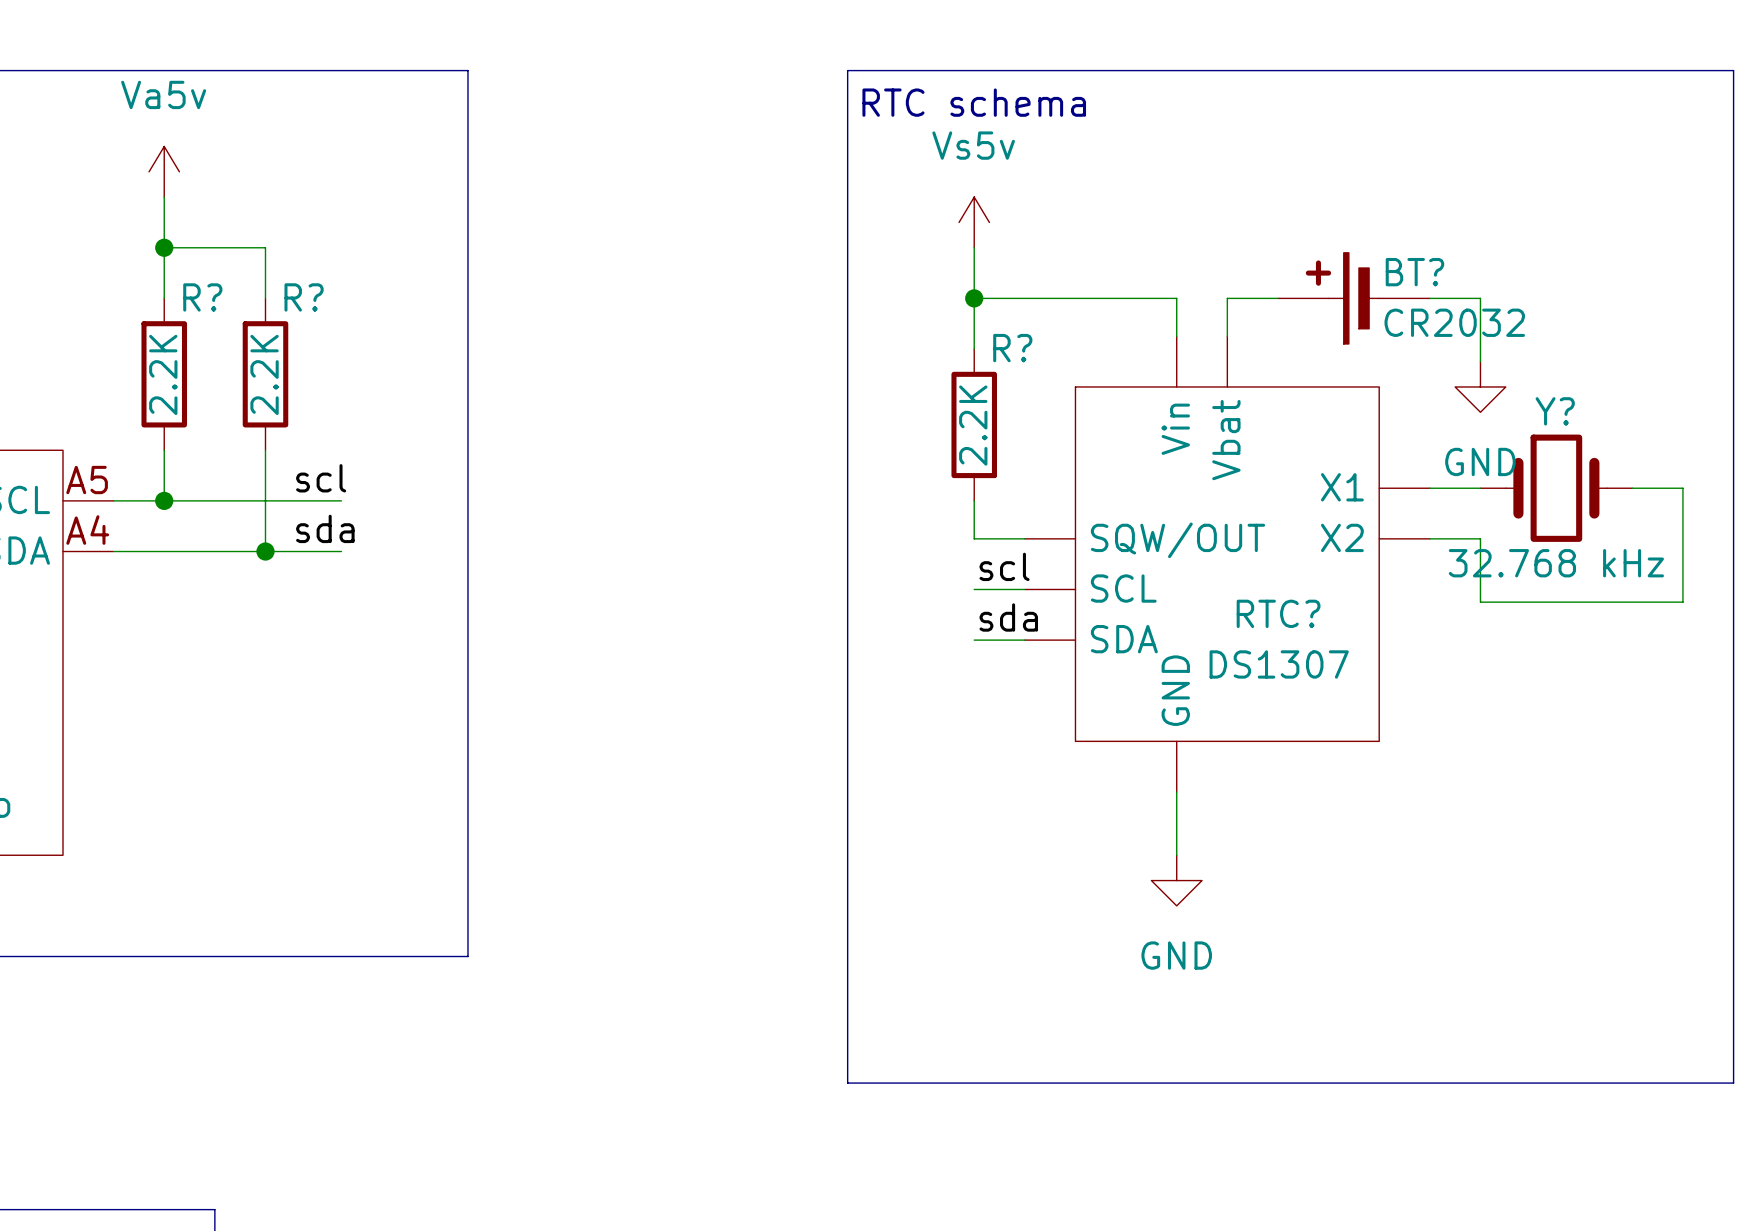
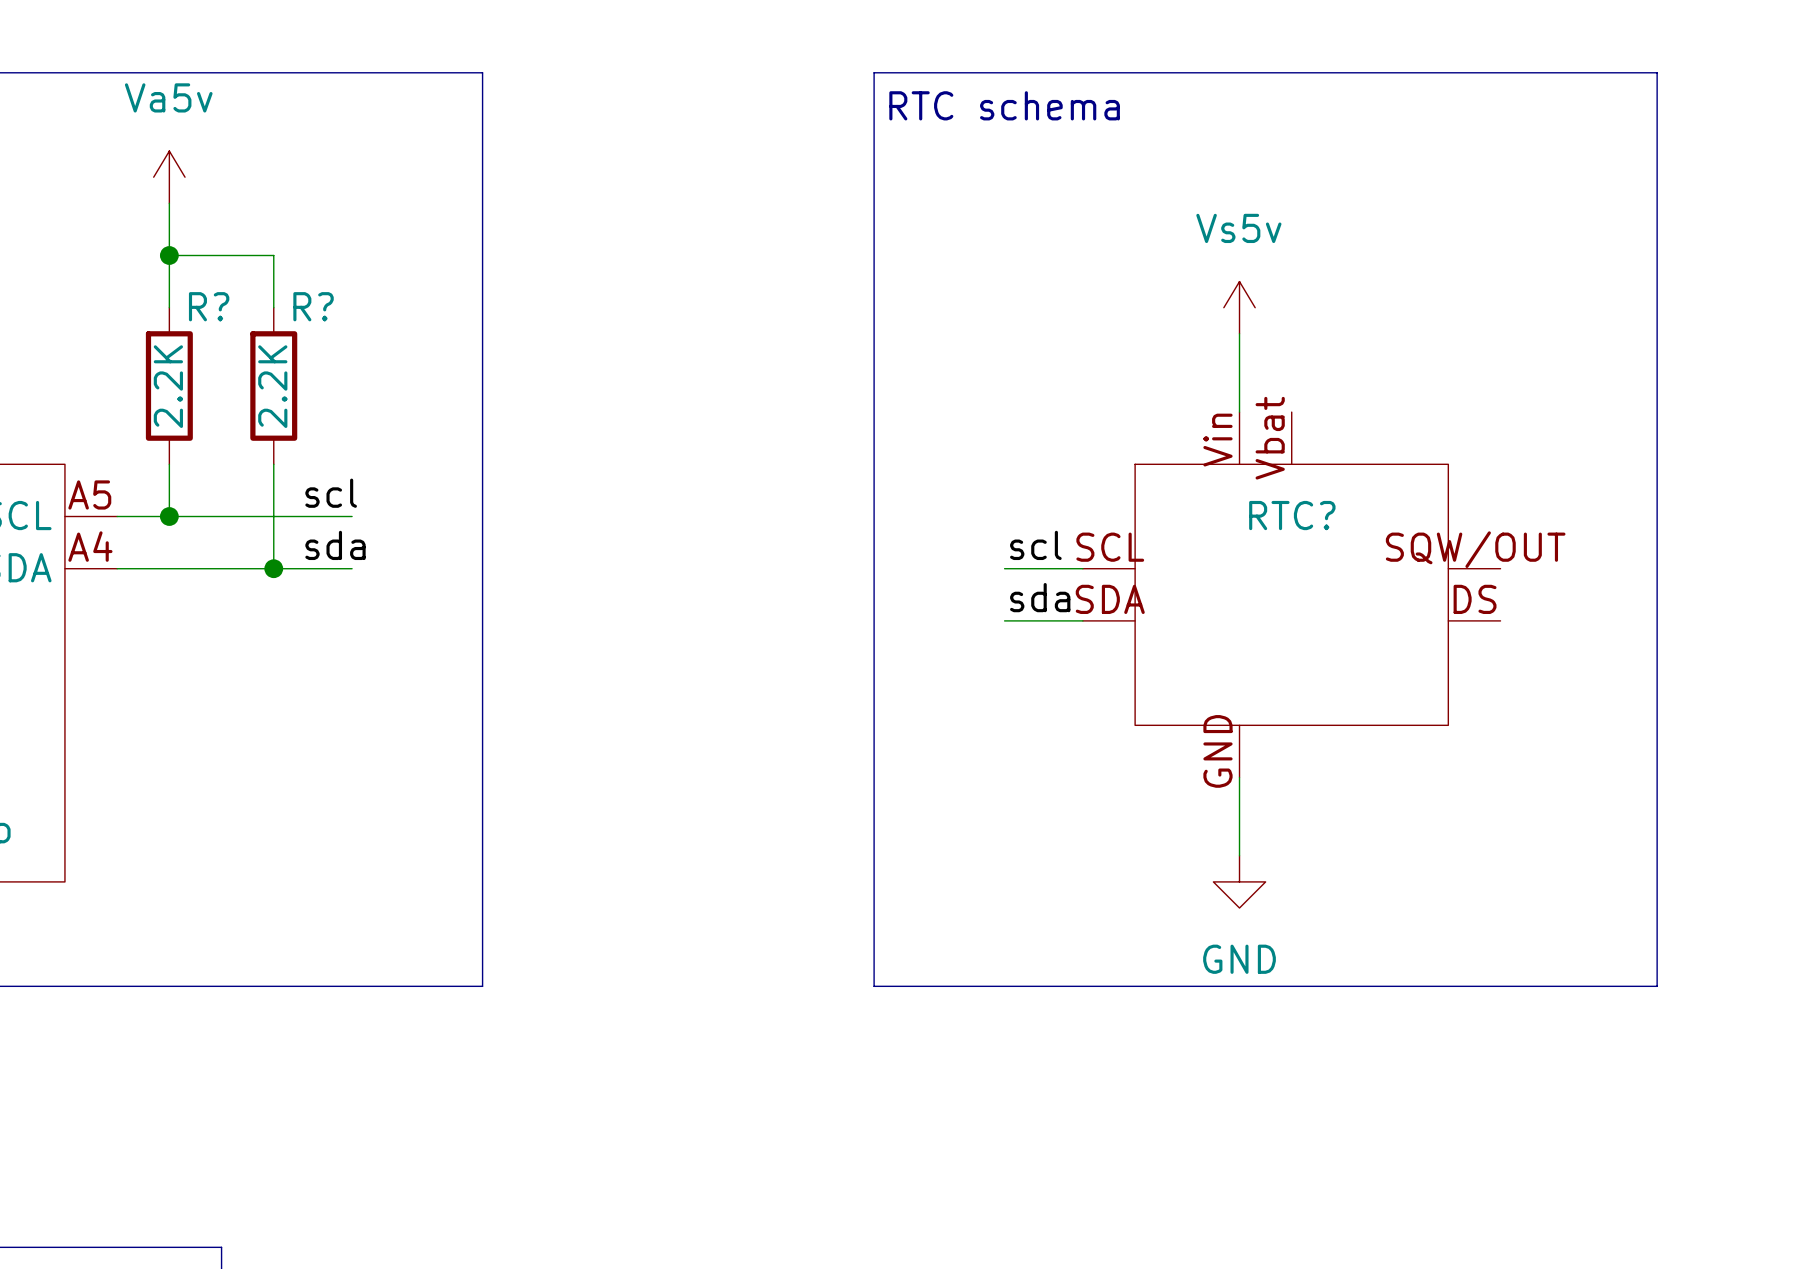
line: (1607, 70) (1733, 70) (1733, 1083) (847, 1083) (847, 956) -> (1657, 72) (1657, 986) (874, 986)
power symbol position: Vs5v (974, 222) -> Vs5v (1239, 307)
wire: (974, 247) (974, 349) -> none
wire: (974, 298) (1176, 298) (1176, 336) -> none
junction: (974, 298) -> none
wire: (1277, 298) (1227, 298) (1227, 336) -> none
BT?: CR2032 (1353, 298) -> none
wire: (1429, 298) (1480, 298) (1480, 361) -> none
wire: none -> (1239, 333) (1239, 412)
power symbol: GND (1480, 386) -> none
R?: 2.2K (974, 424) -> none
wire: (1429, 488) (1480, 488) -> none
Y?: 32.768 kHz (1556, 488) -> none
wire: (1632, 488) (1682, 488) (1682, 602) (1480, 602) (1480, 538) (1429, 538) -> none
wire: (974, 500) (974, 538) (1024, 538) -> none
wire: none -> (1004, 568) (1082, 568)
RTC?: DS1307 (1227, 564) -> none
label position: scl (1004, 566) -> scl (1035, 545)
RTC?: none -> (1291, 594)
wire: (974, 589) (1024, 589) -> none
wire: none -> (1004, 620) (1082, 620)
label position: sda (1008, 617) -> sda (1040, 597)
wire: (974, 640) (1024, 640) -> none
wire: none -> (1239, 777) (1239, 855)
wire: (1176, 791) (1176, 855) -> none
power symbol position: GND (1176, 880) -> GND (1239, 881)

